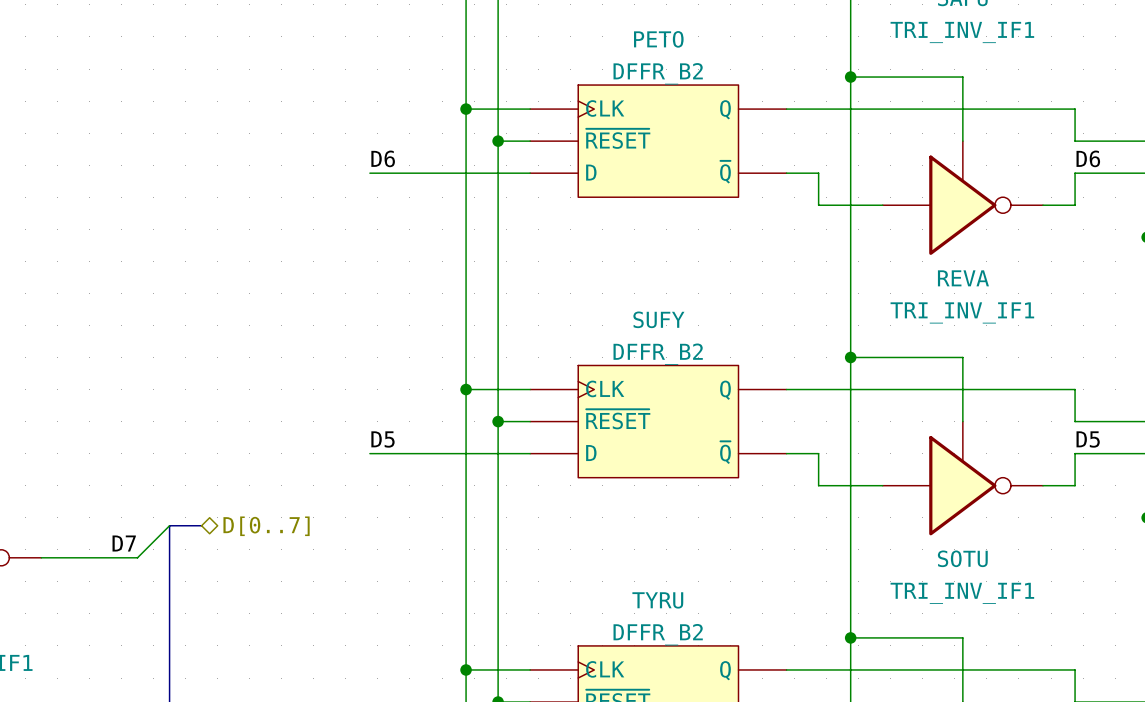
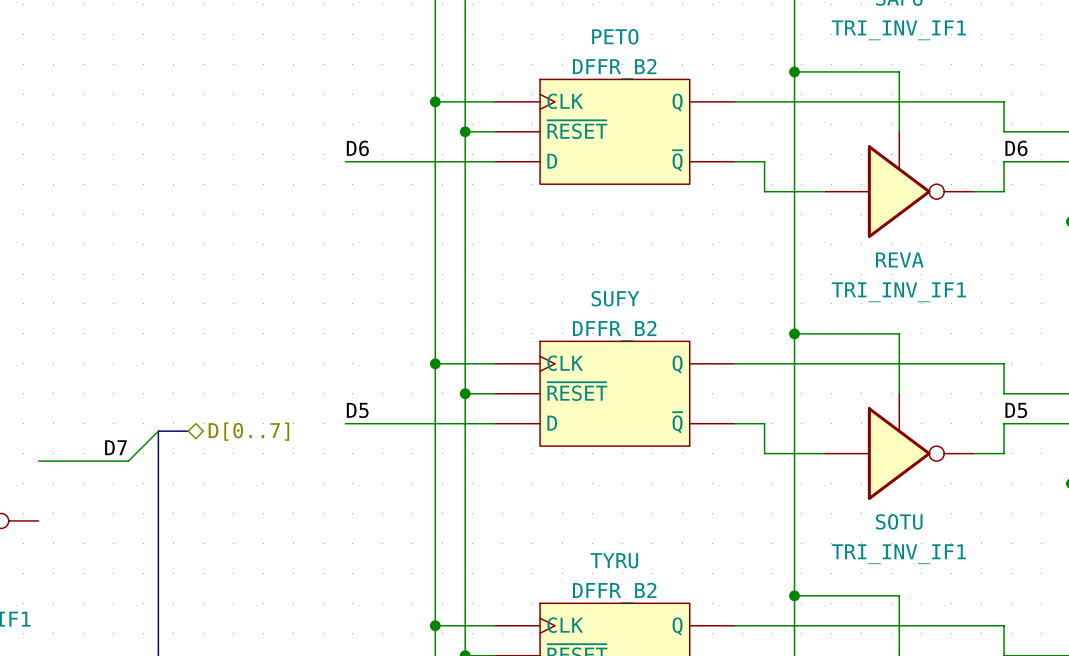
wire: (169, 525) (137, 557) (41, 557) -> (158, 431) (128, 461) (38, 461)
bus: (169, 525) (201, 525) -> (158, 491) (158, 431) (188, 431)
hierarchical label position: D[0..7] (266, 526) -> D[0..7] (248, 431)
label position: D7 (124, 543) -> D7 (115, 447)

